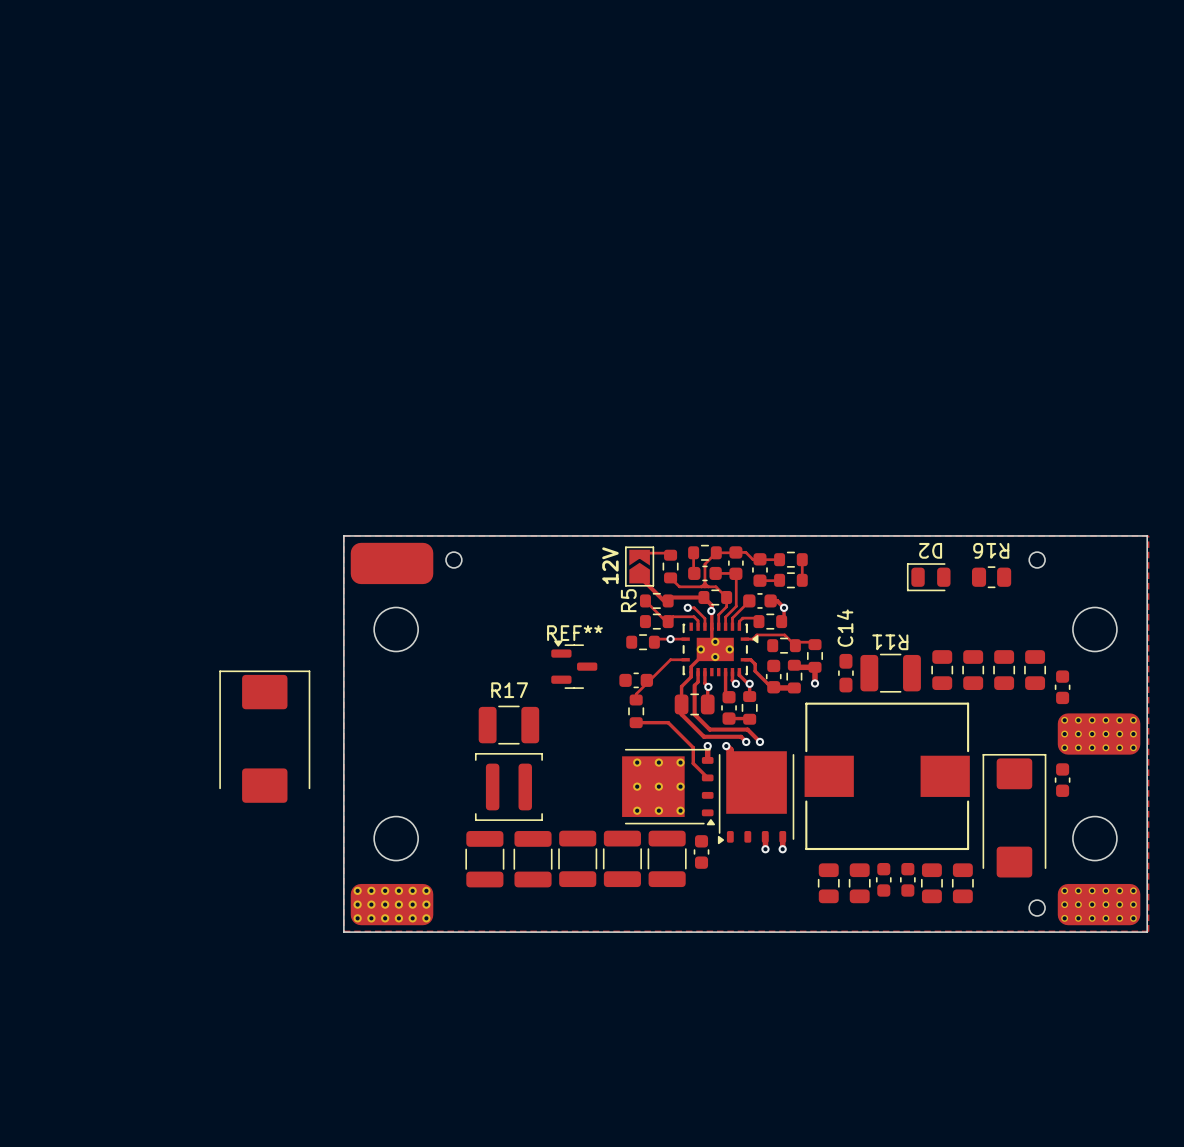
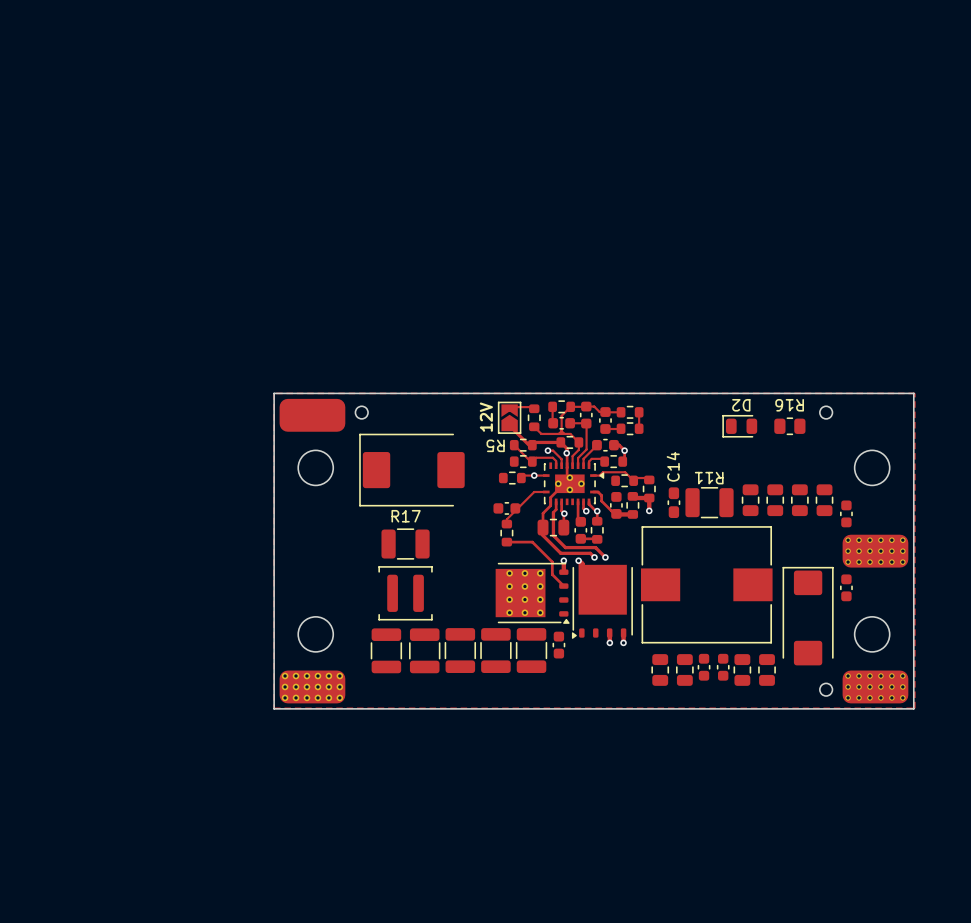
R5 name rotation: 0° (628, 600) -> 90° counterclockwise (495, 445)
REF**: (574, 664) -> none
part rotation: 0° (264, 736) -> 90° counterclockwise (412, 470)
part position: (264, 736) -> (412, 470)
part footprint: [622, 748, 716, 826] -> [495, 562, 570, 624]

